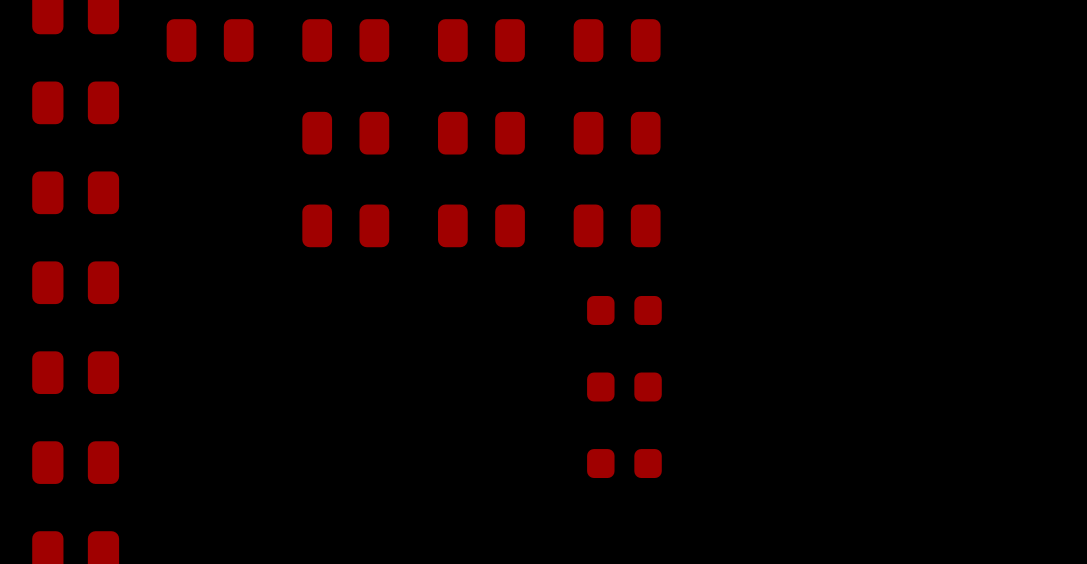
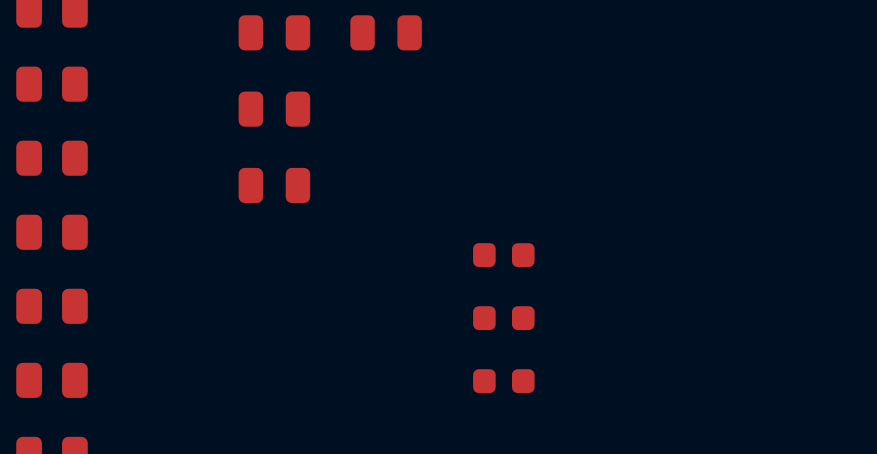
part: (210, 40) -> none
part: (617, 40) -> none
part: (481, 133) -> none
part: (617, 133) -> none
part: (481, 225) -> none
part: (617, 225) -> none

